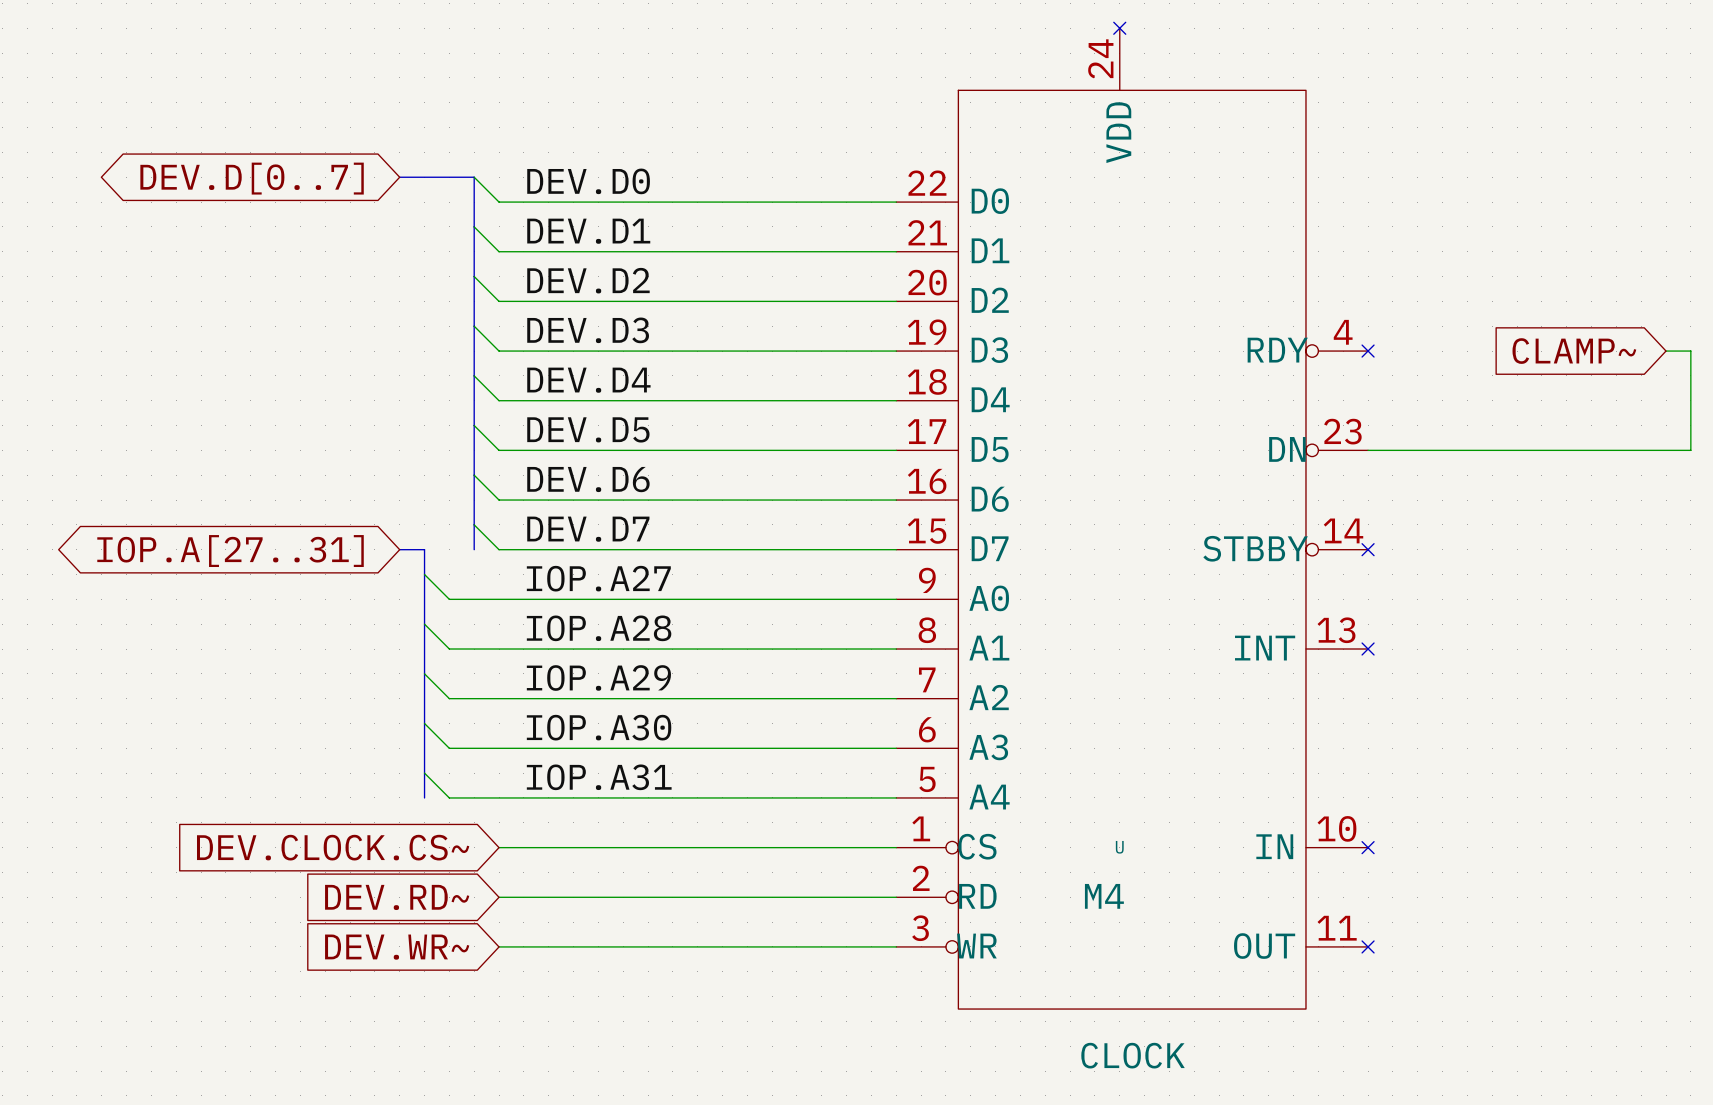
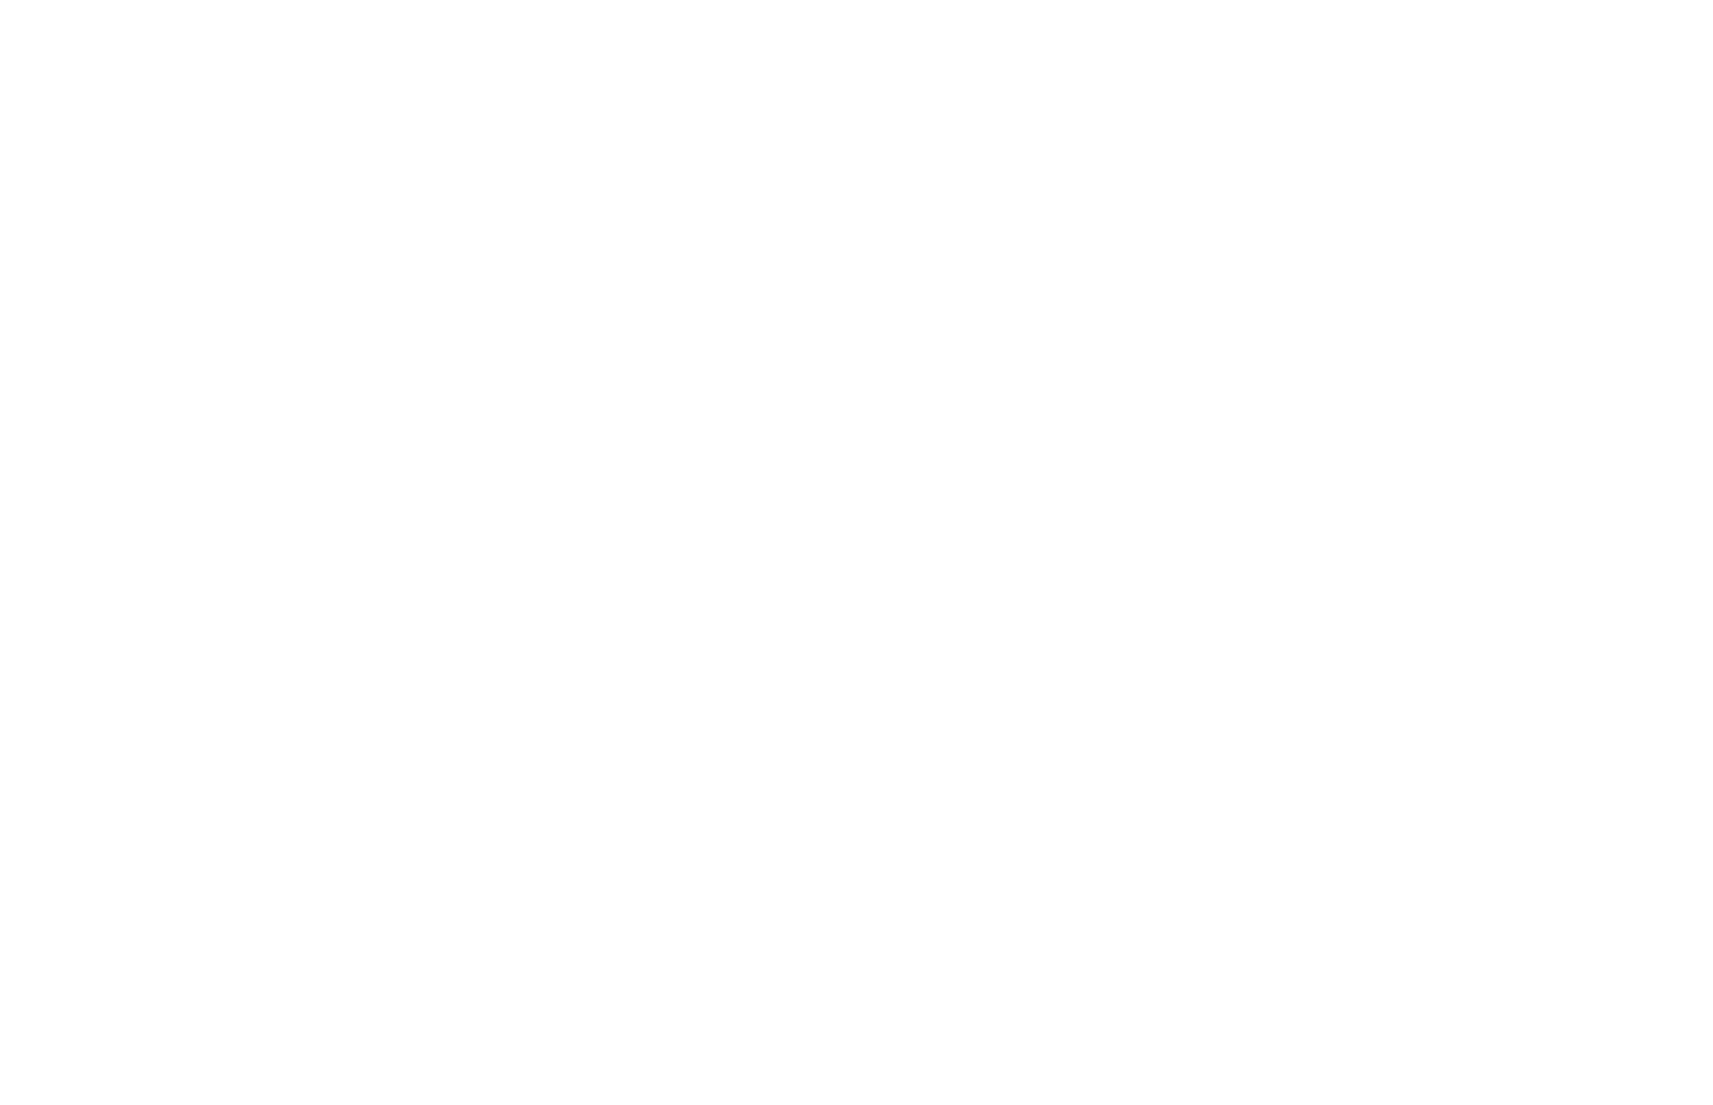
no-connect mark: (1119, 28) -> none
bus: (399, 177) (474, 177) (474, 549) -> none
wire: (474, 177) (499, 202) (896, 202) -> none
global label: DEV.D[0..7] (252, 178) -> none
label: DEV.D0 (588, 181) -> none
wire: (474, 226) (499, 251) (896, 251) -> none
label: DEV.D1 (588, 231) -> none
wire: (474, 276) (499, 301) (896, 301) -> none
label: DEV.D2 (588, 280) -> none
wire: (474, 326) (499, 351) (896, 351) -> none
label: DEV.D3 (588, 330) -> none
no-connect mark: (1368, 351) -> none
global label: CLAMP~ (1574, 351) -> none
wire: (1666, 351) (1690, 351) (1690, 450) (1368, 450) -> none
wire: (474, 375) (499, 400) (896, 400) -> none
label: DEV.D4 (588, 380) -> none
wire: (474, 425) (499, 450) (896, 450) -> none
label: DEV.D5 (588, 429) -> none
wire: (474, 475) (499, 500) (896, 500) -> none
label: DEV.D6 (588, 479) -> none
U: (1132, 518) -> none
wire: (474, 524) (499, 549) (896, 549) -> none
label: DEV.D7 (588, 529) -> none
bus: (399, 549) (424, 549) (424, 797) -> none
no-connect mark: (1368, 549) -> none
global label: IOP.A[27..31] (230, 551) -> none
wire: (424, 574) (449, 599) (896, 599) -> none
label: IOP.A27 (598, 578) -> none
wire: (424, 624) (449, 649) (896, 649) -> none
label: IOP.A28 (599, 628) -> none
no-connect mark: (1368, 649) -> none
wire: (424, 673) (449, 698) (896, 698) -> none
label: IOP.A29 (598, 677) -> none
wire: (424, 723) (449, 748) (896, 748) -> none
label: IOP.A30 (599, 727) -> none
wire: (424, 773) (449, 797) (896, 797) -> none
label: IOP.A31 (599, 777) -> none
global label: DEV.CLOCK.CS~ (333, 847) -> none
wire: (499, 847) (896, 847) -> none
no-connect mark: (1368, 847) -> none
global label: DEV.RD~ (397, 897) -> none
wire: (499, 897) (896, 897) -> none
wire: (499, 946) (896, 946) -> none
no-connect mark: (1368, 946) -> none
global label: DEV.WR~ (397, 947) -> none

